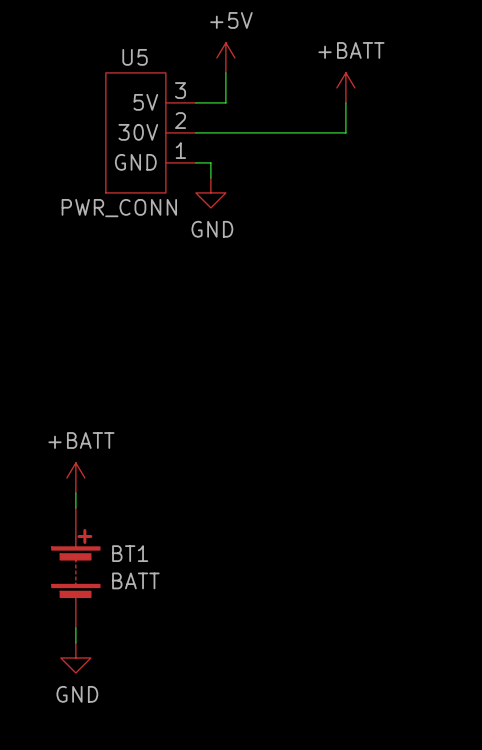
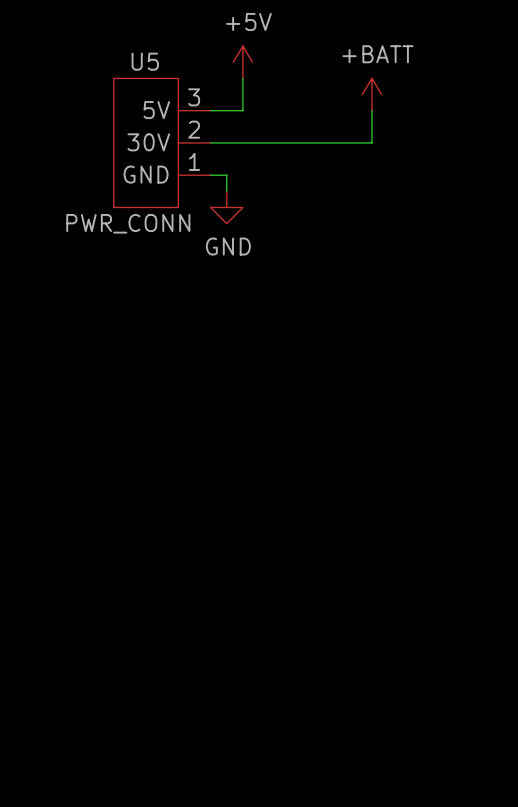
power symbol: +BATT (75, 477) -> none
wire: (75, 492) (75, 507) -> none
BT1: BATT (75, 567) -> none
wire: (75, 627) (75, 642) -> none
power symbol: GND (75, 657) -> none

